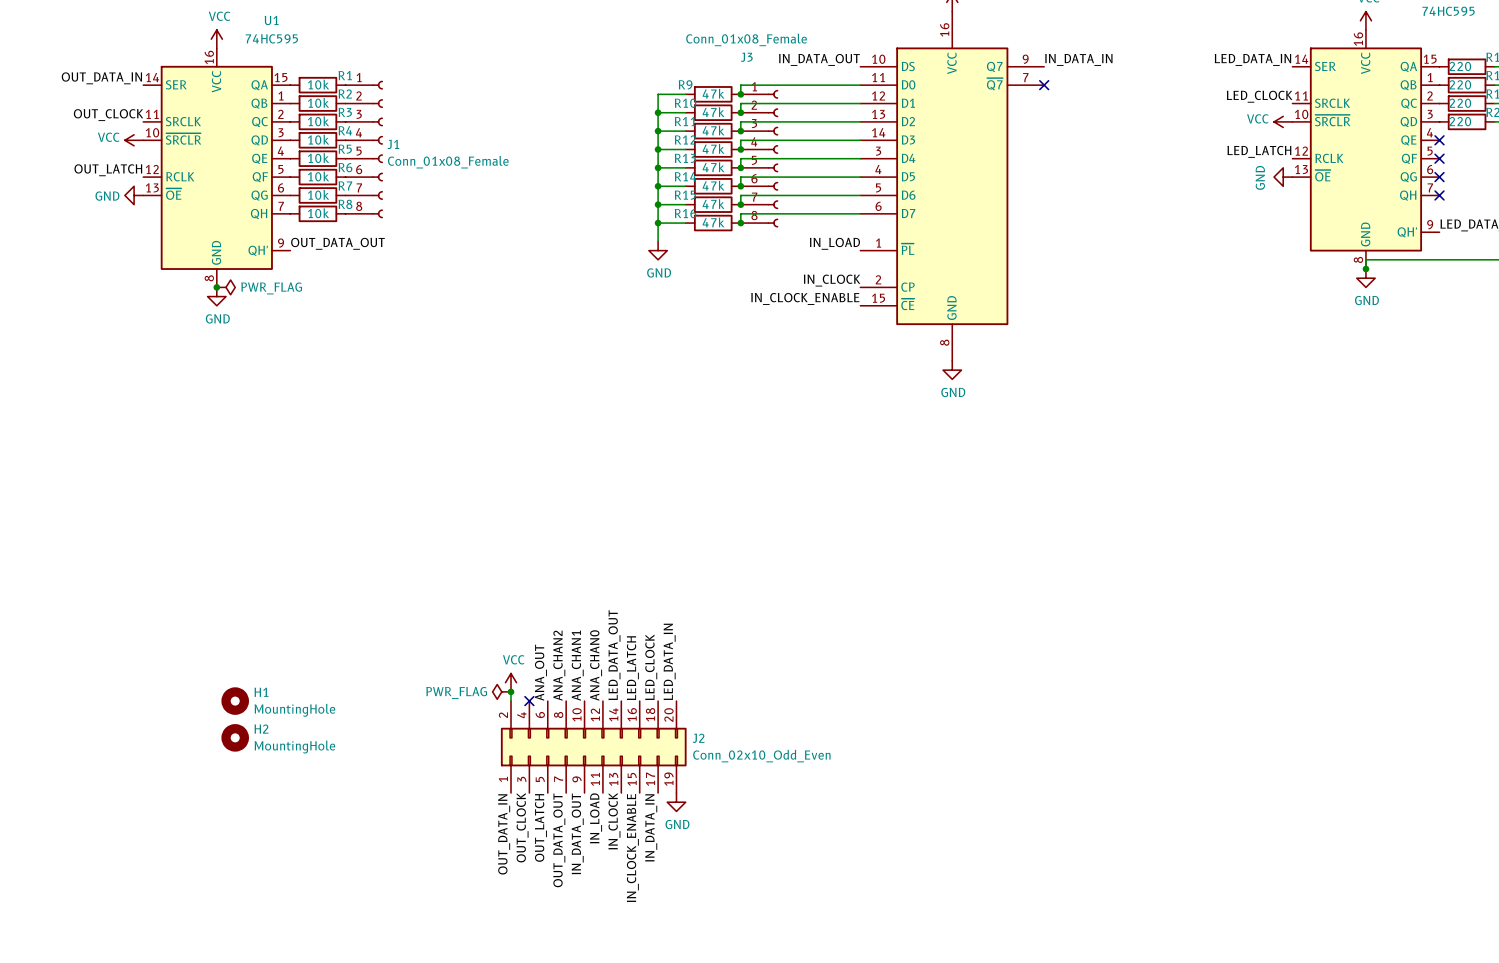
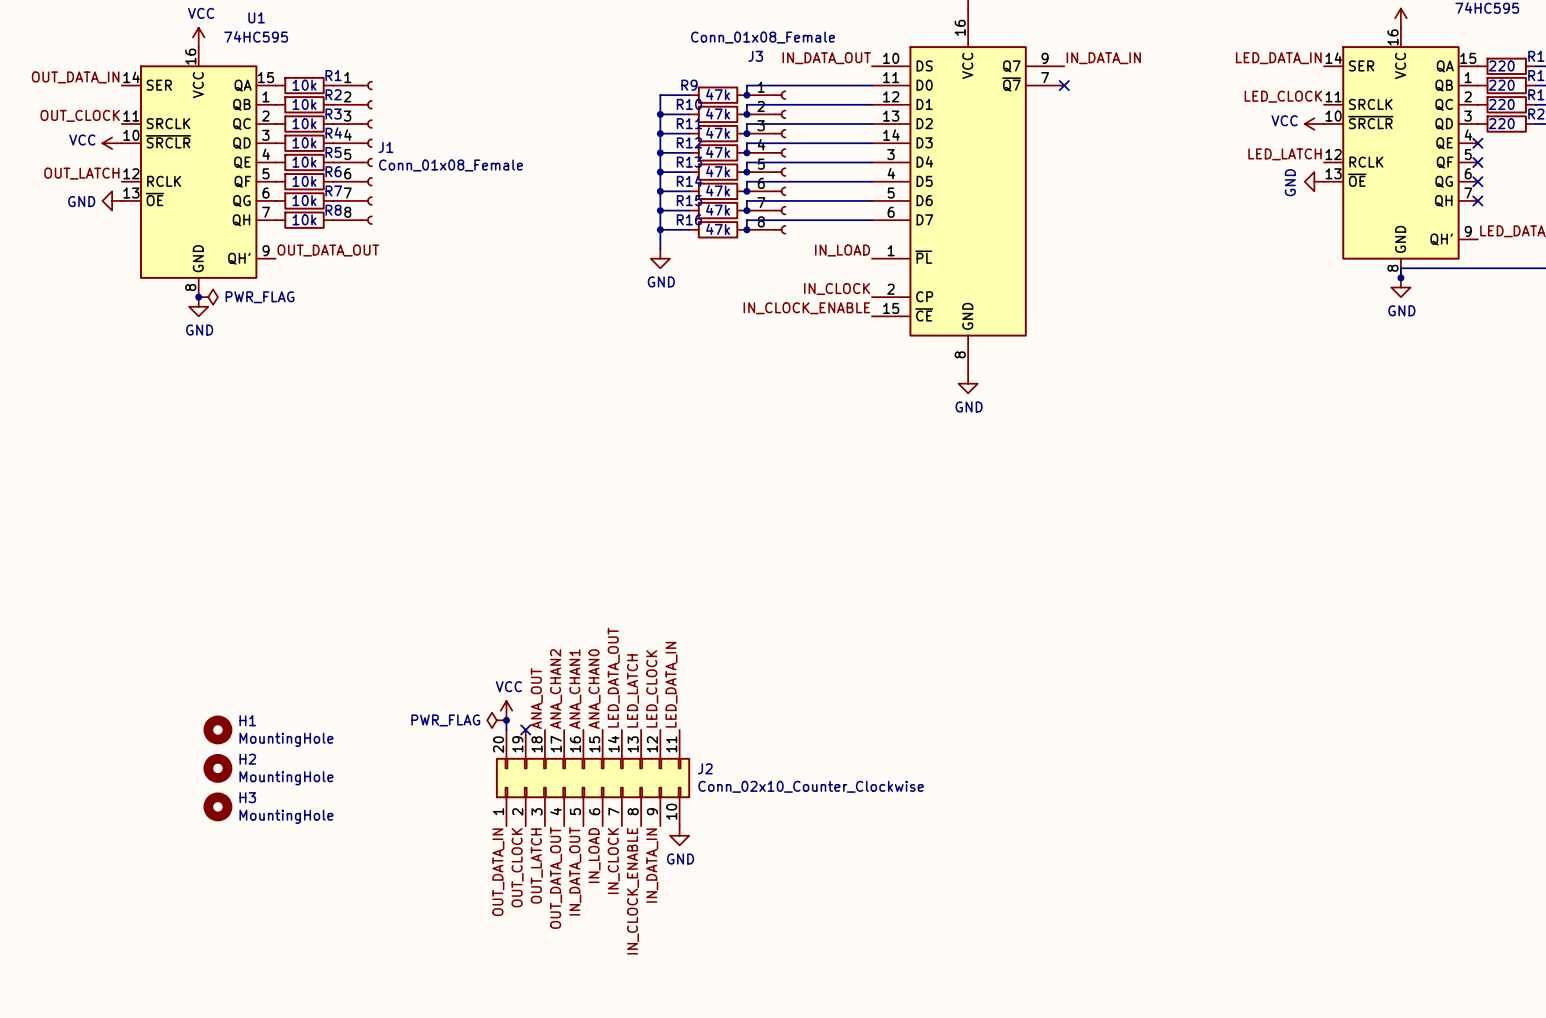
J2 symbol: [500, 701, 687, 794] -> [495, 729, 691, 827]
J2 value: Conn_02x10_Odd_Even (761, 756) -> Conn_02x10_Counter_Clockwise (811, 786)
H3: none -> MountingHole (217, 806)

